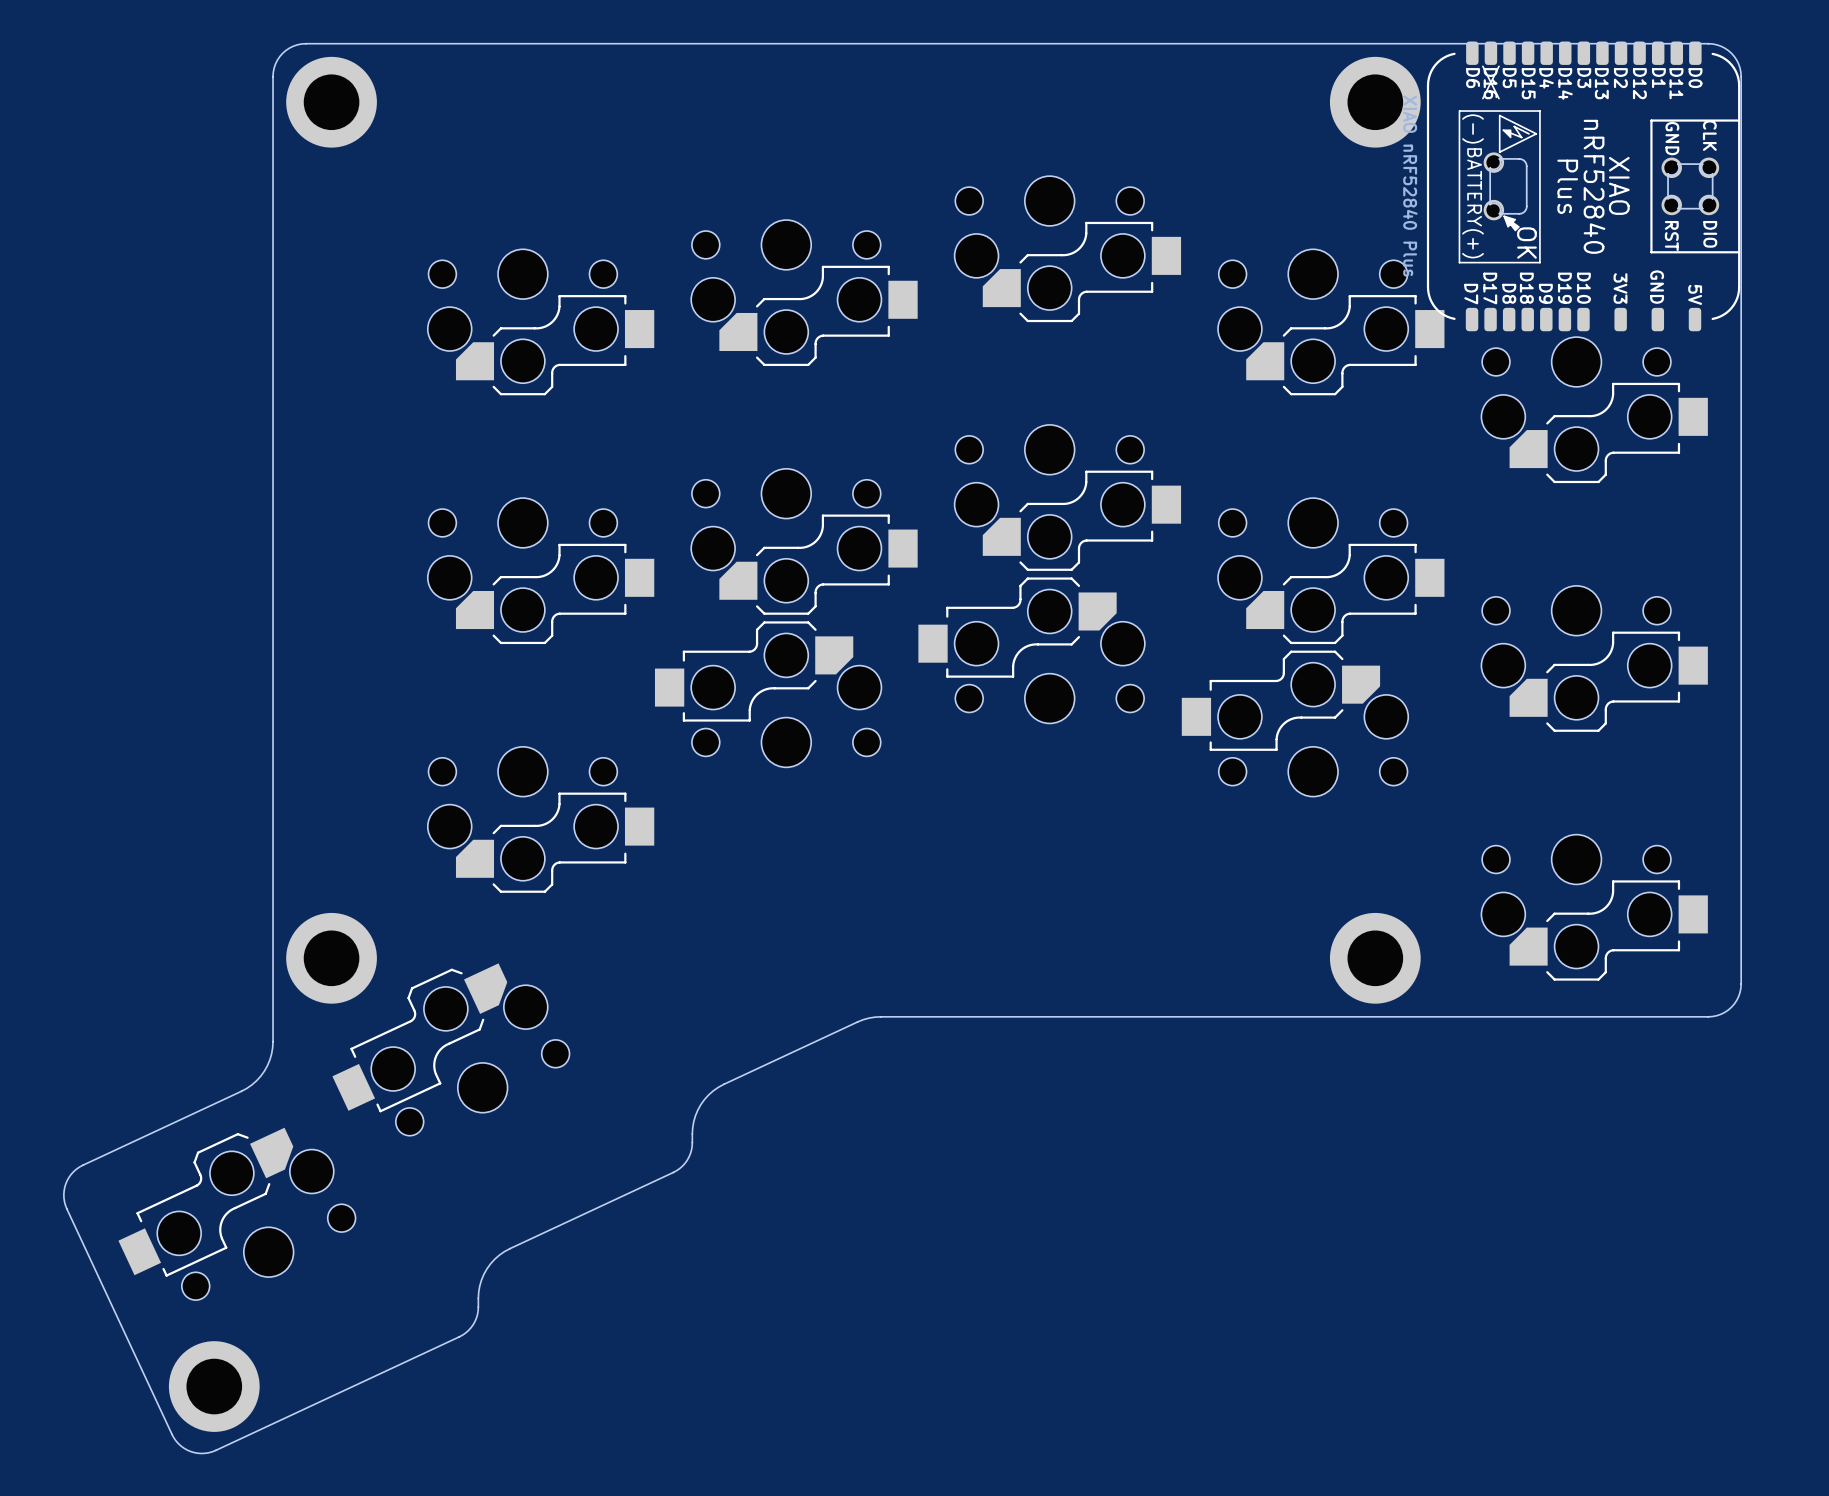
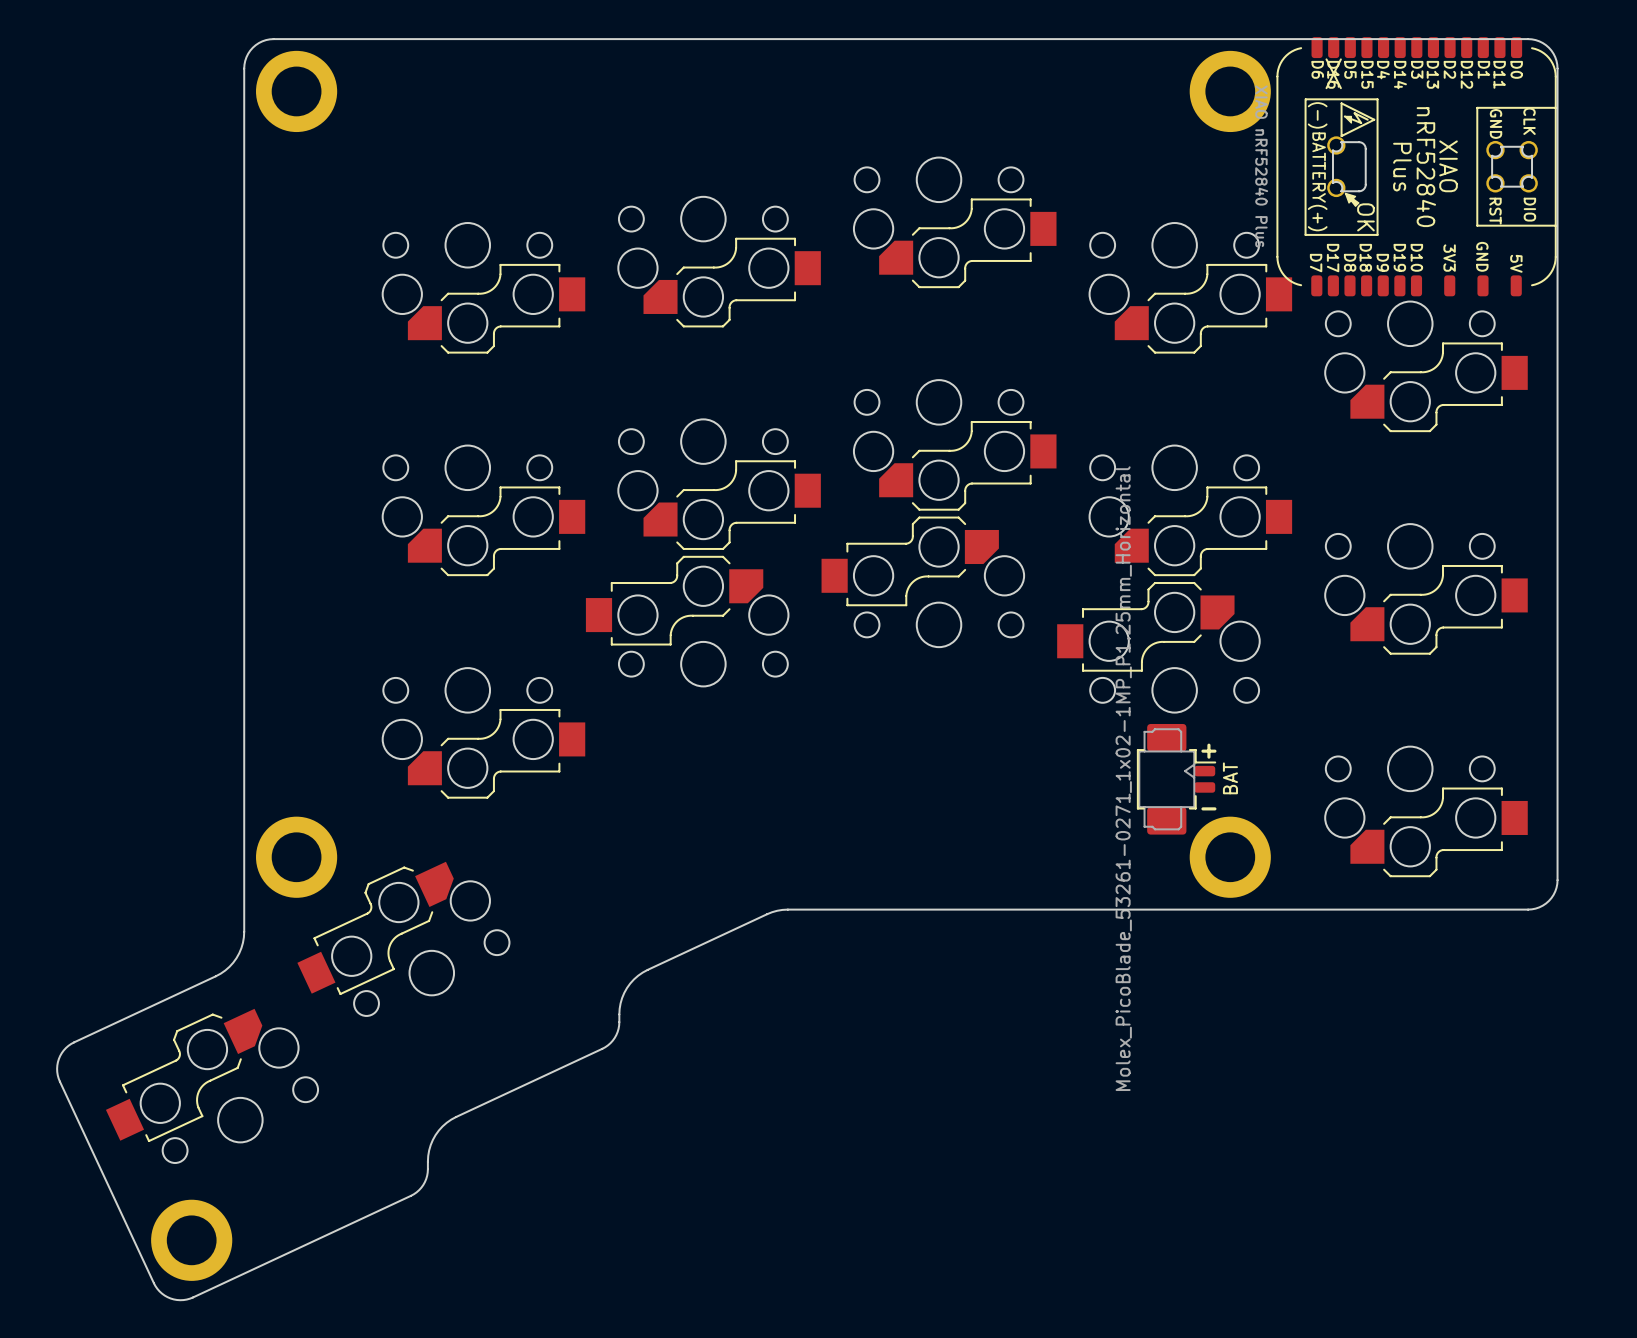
text: none -> + (1208, 751)
BAT: none -> Molex_PicoBlade_53261-0271_1x02-1MP_P1.25mm_Horizontal (1176, 779)
text: none -> - (1208, 808)

